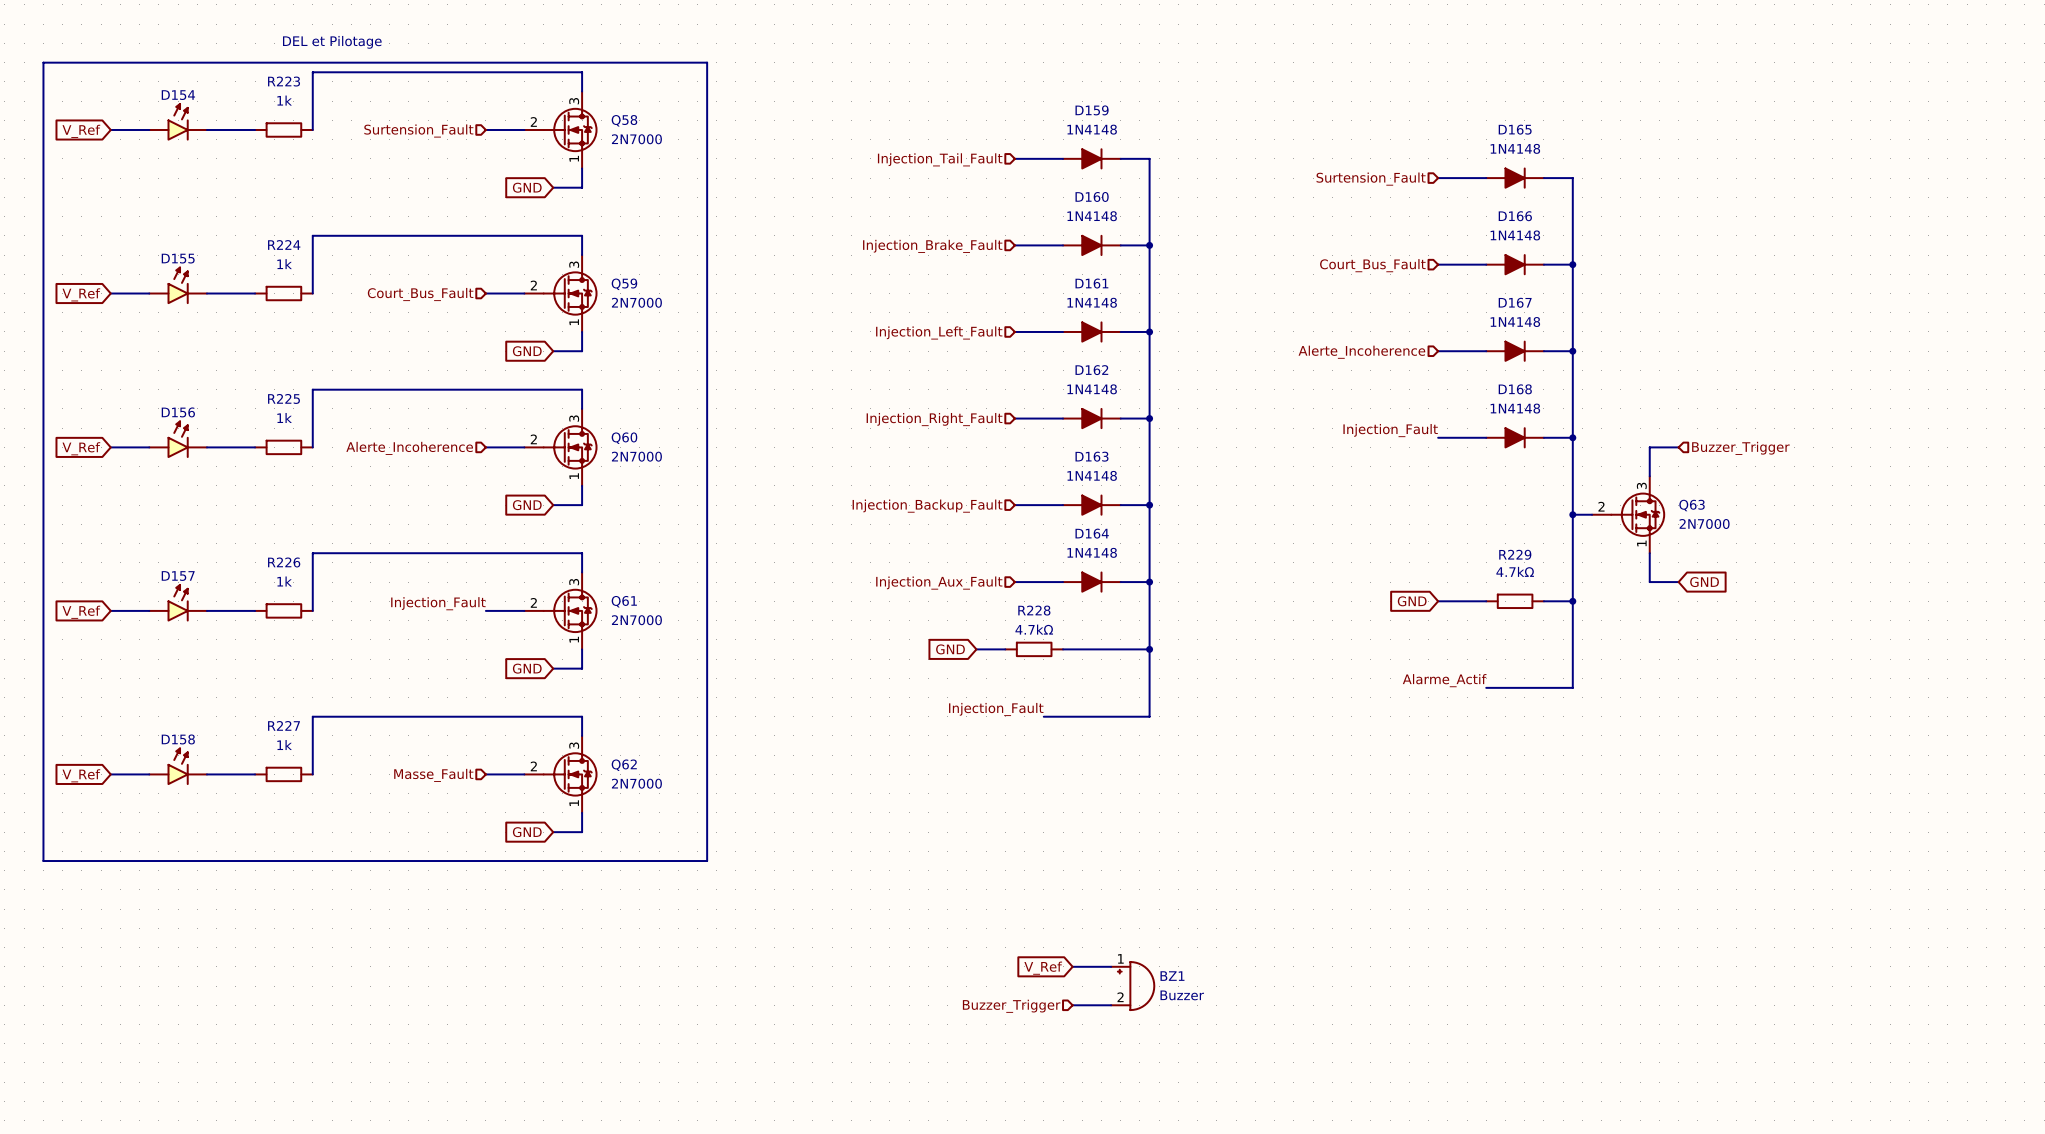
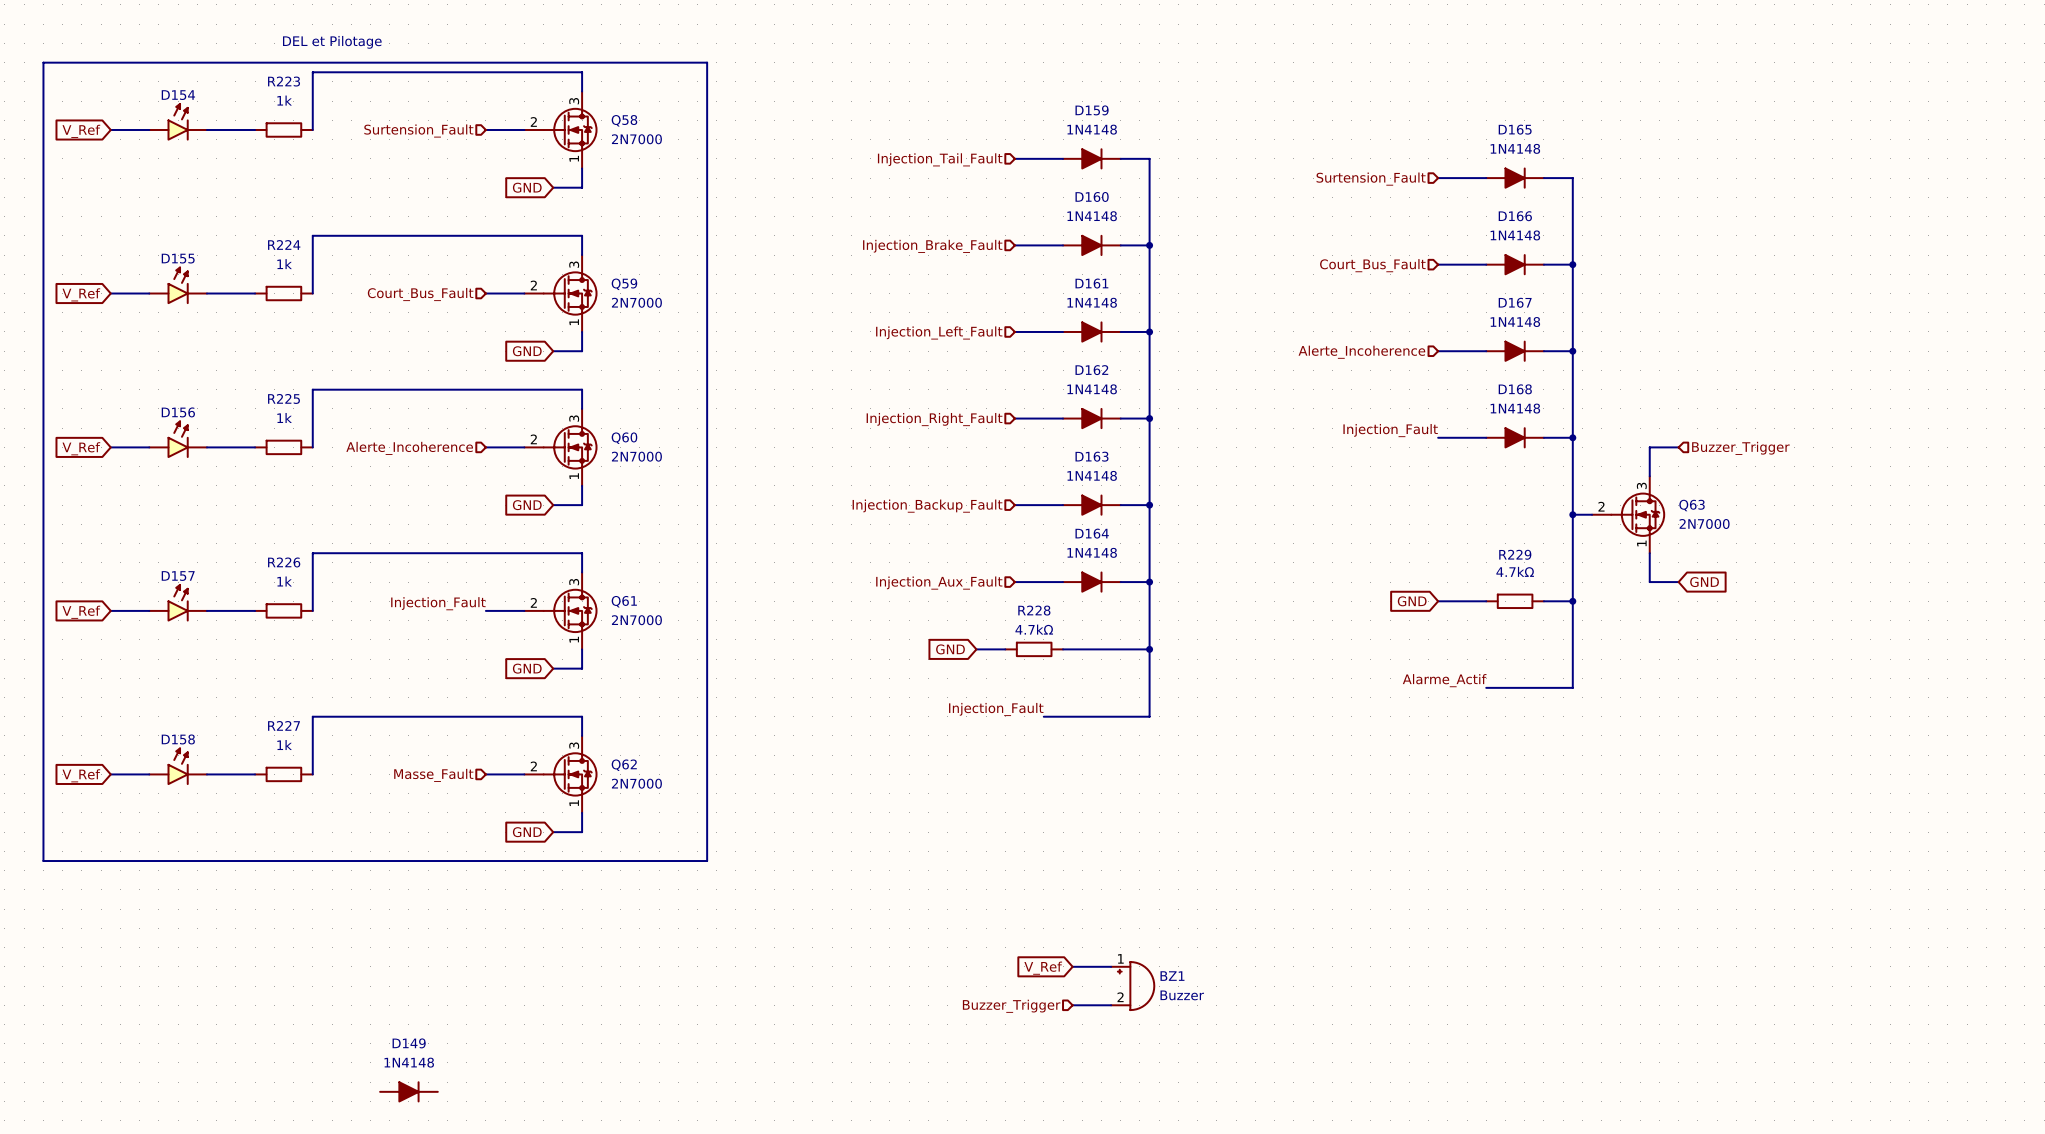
D149: none -> 1N4148 (408, 1091)

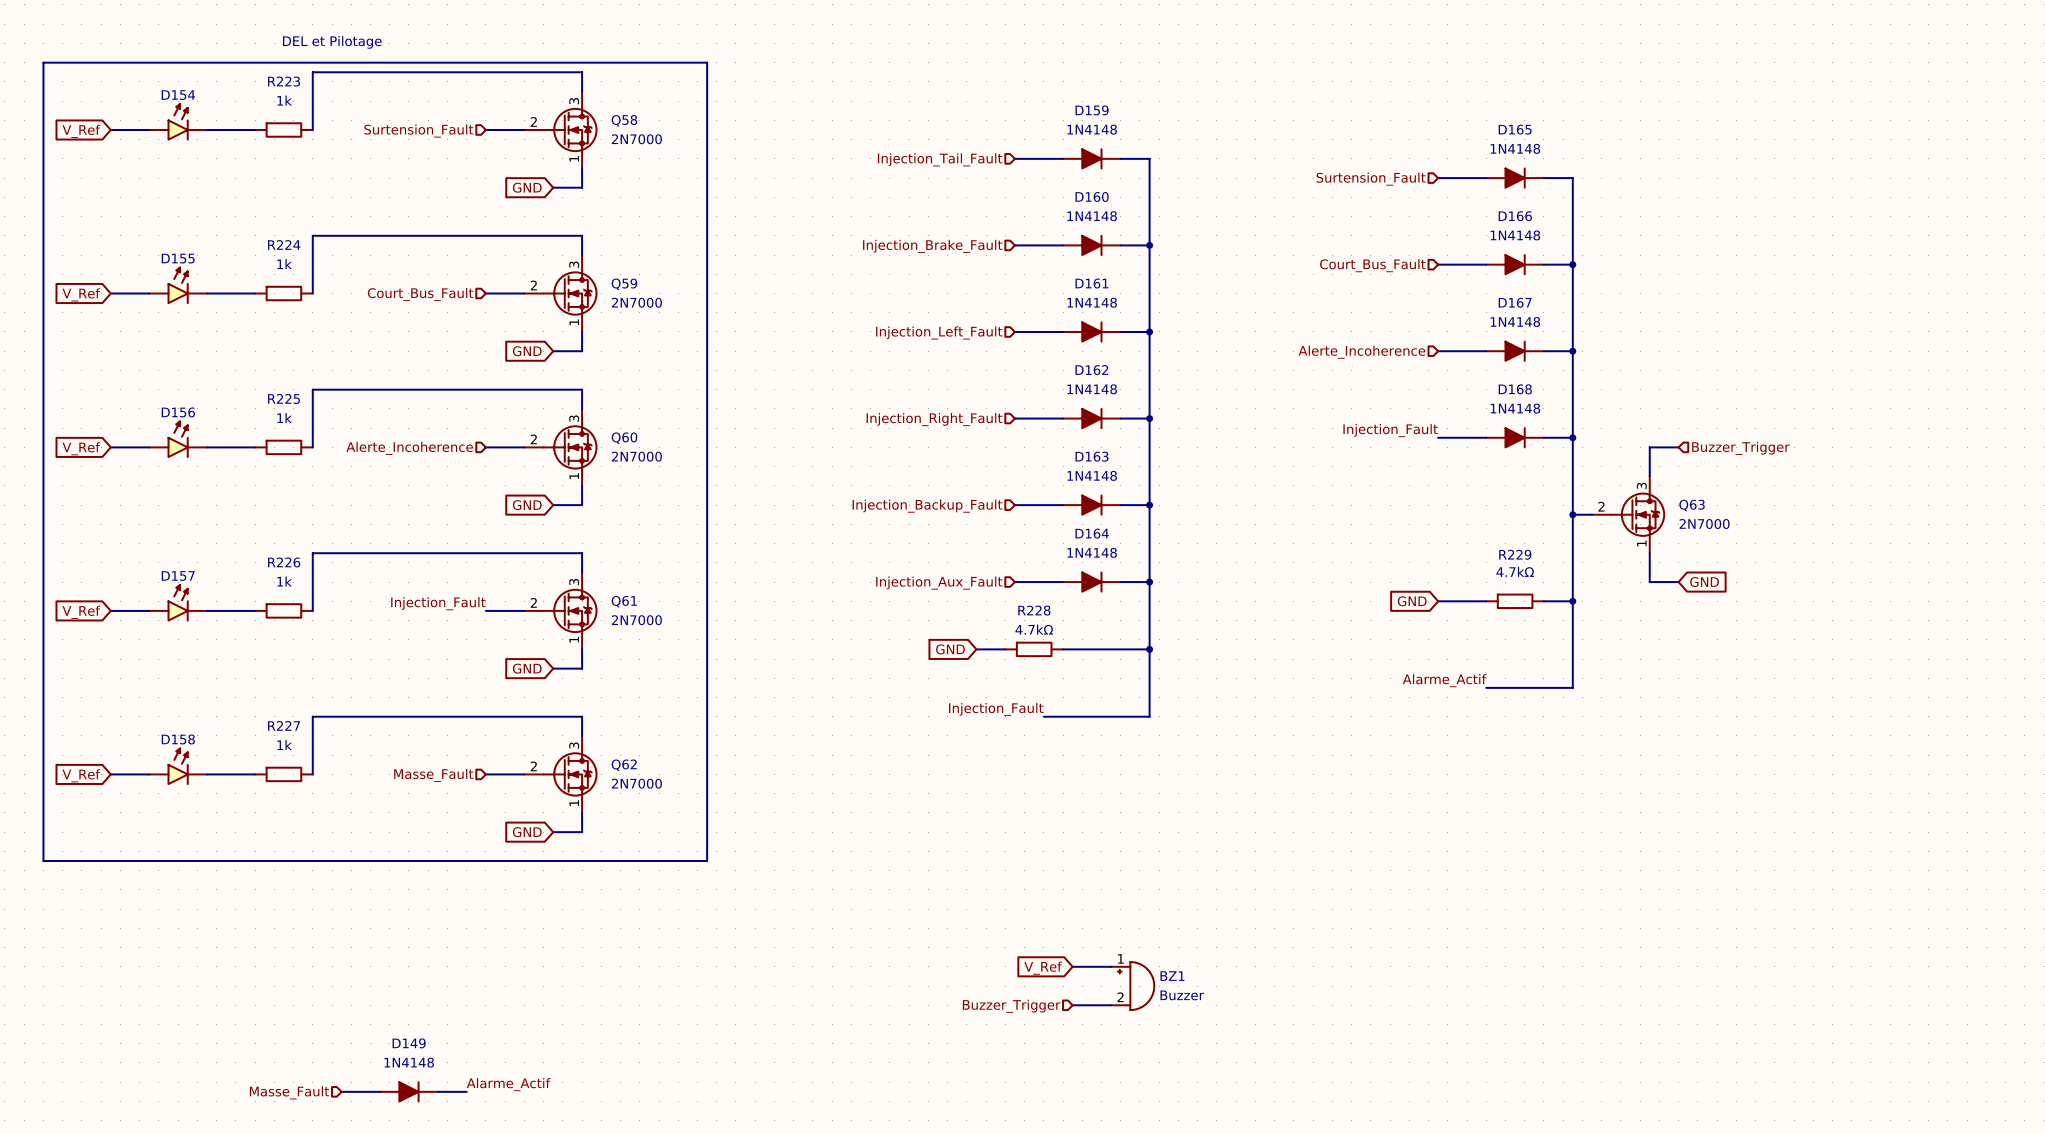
label: none -> Alarme_Actif (508, 1084)
wire: none -> (341, 1091) (380, 1091)
wire: none -> (437, 1091) (466, 1091)
hierarchical label: none -> Masse_Fault (289, 1092)

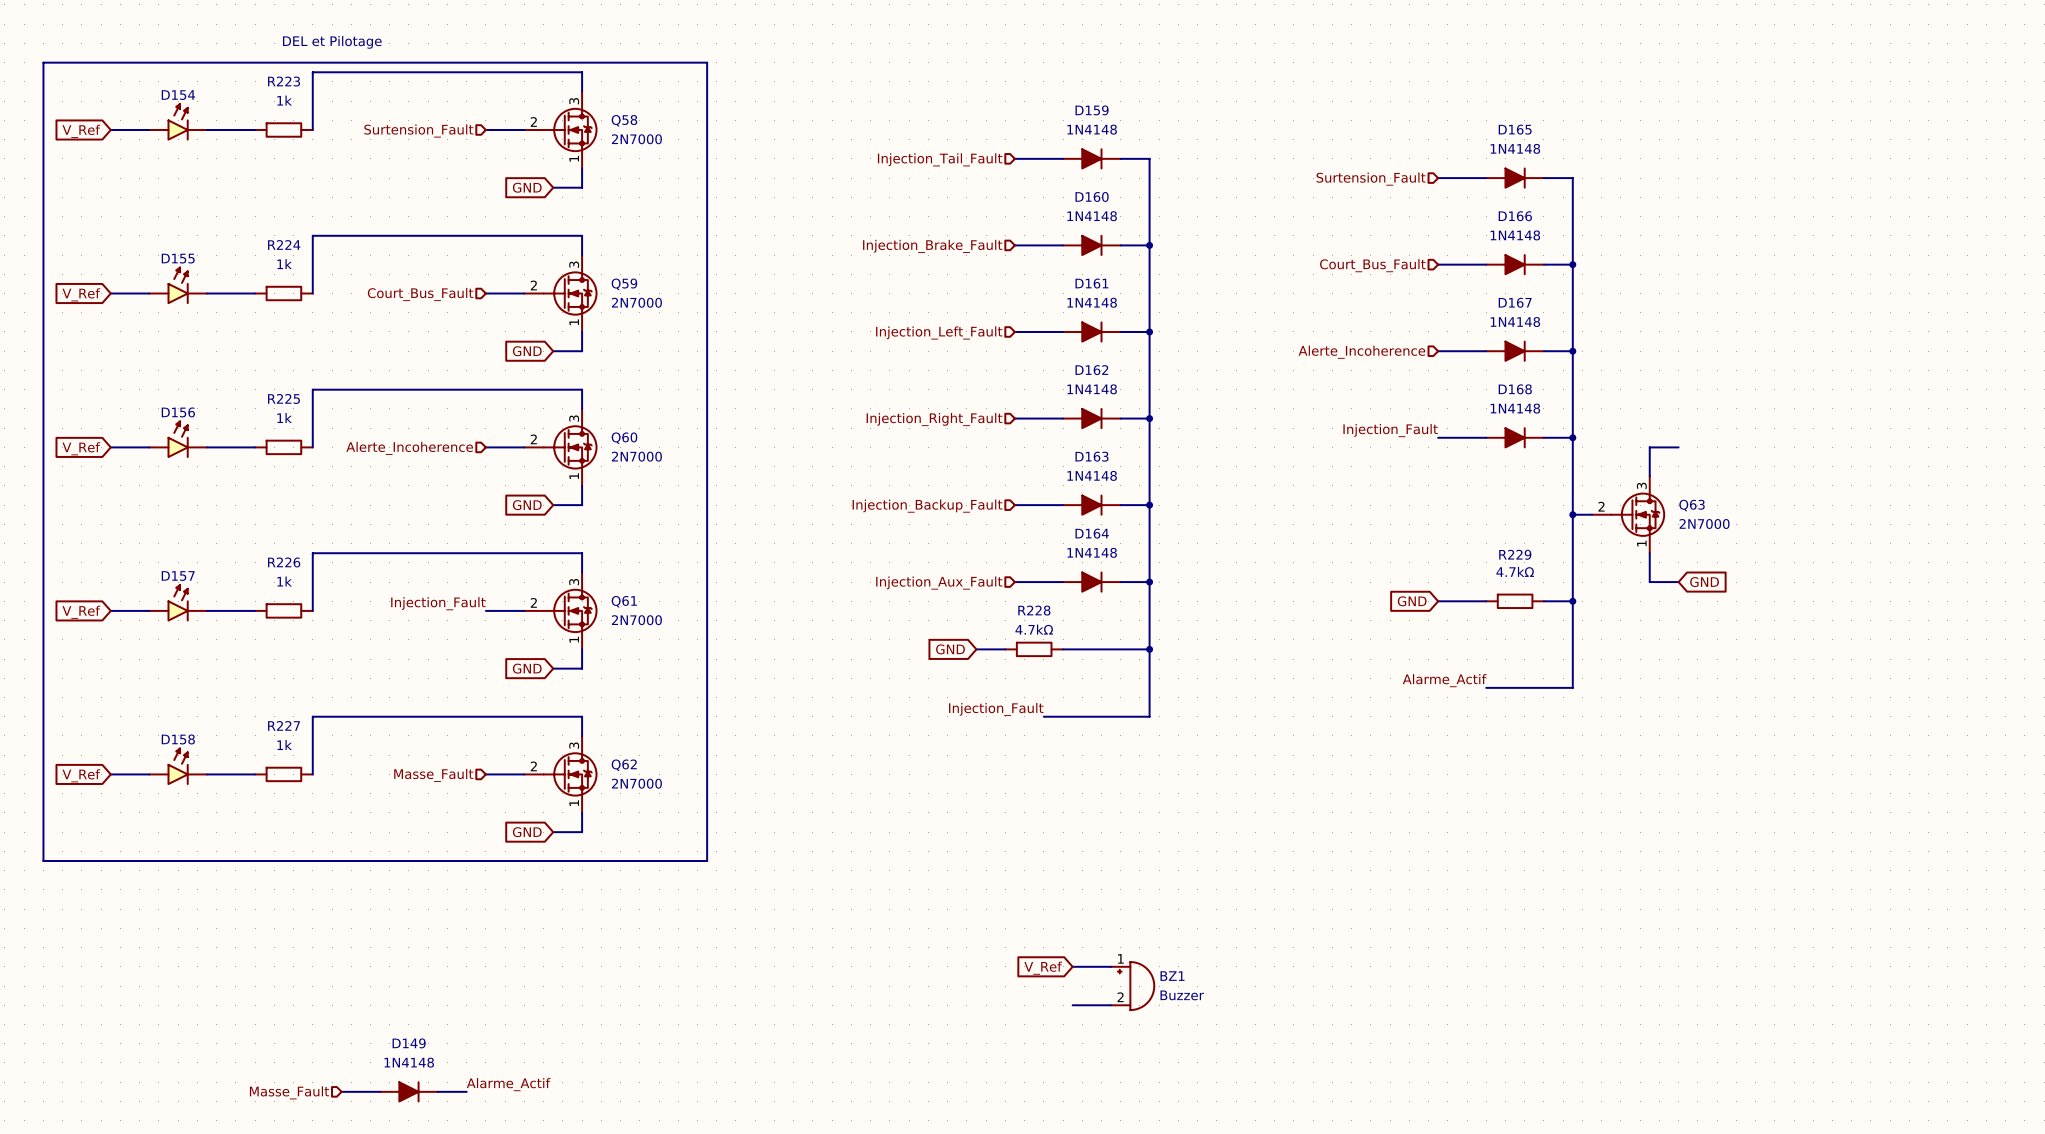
hierarchical label: Buzzer_Trigger (1740, 448) -> none
hierarchical label: Buzzer_Trigger (1011, 1006) -> none

